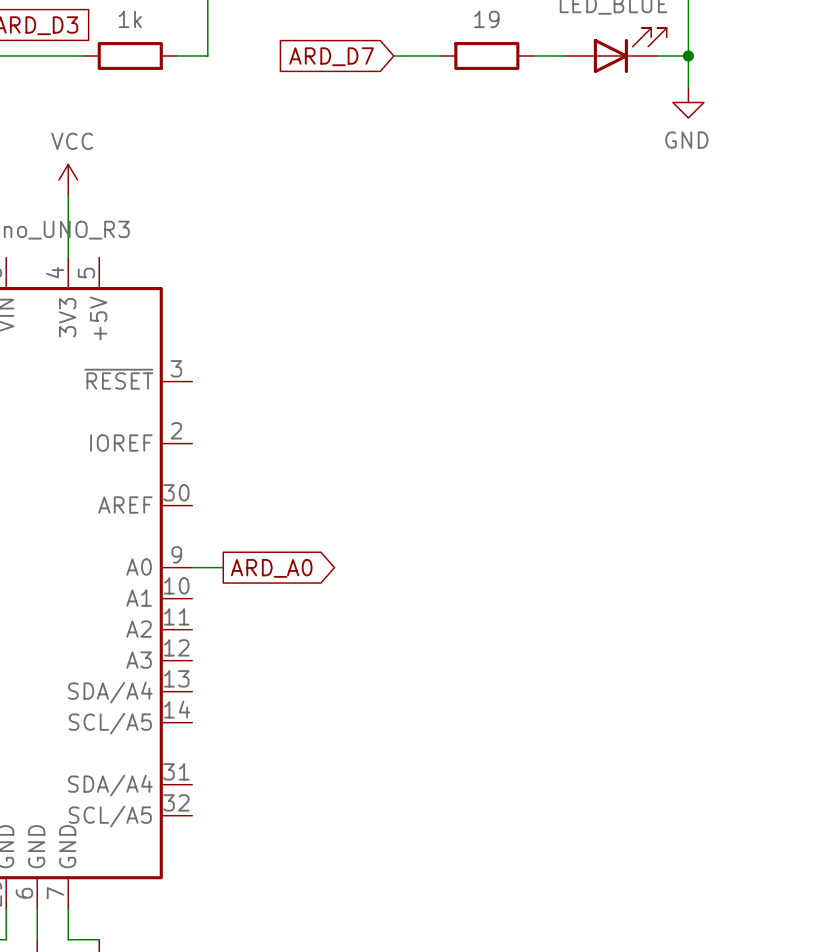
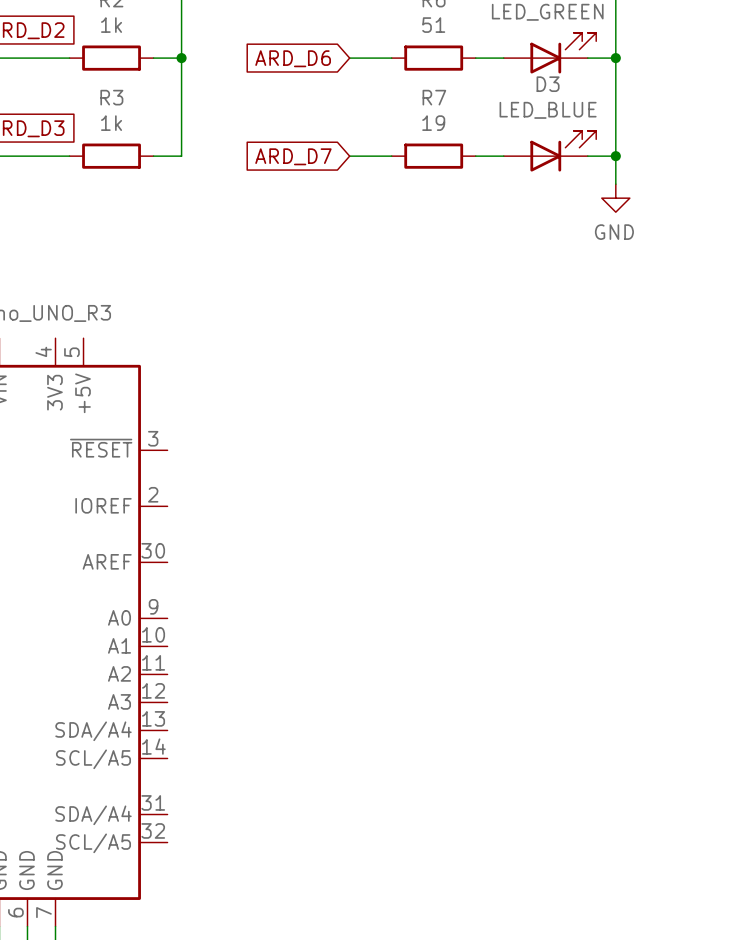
power symbol: VCC (68, 180) -> none
wire: (68, 195) (68, 257) -> none
wire: (192, 567) (223, 567) -> none
global label: ARD_A0 (271, 568) -> none

